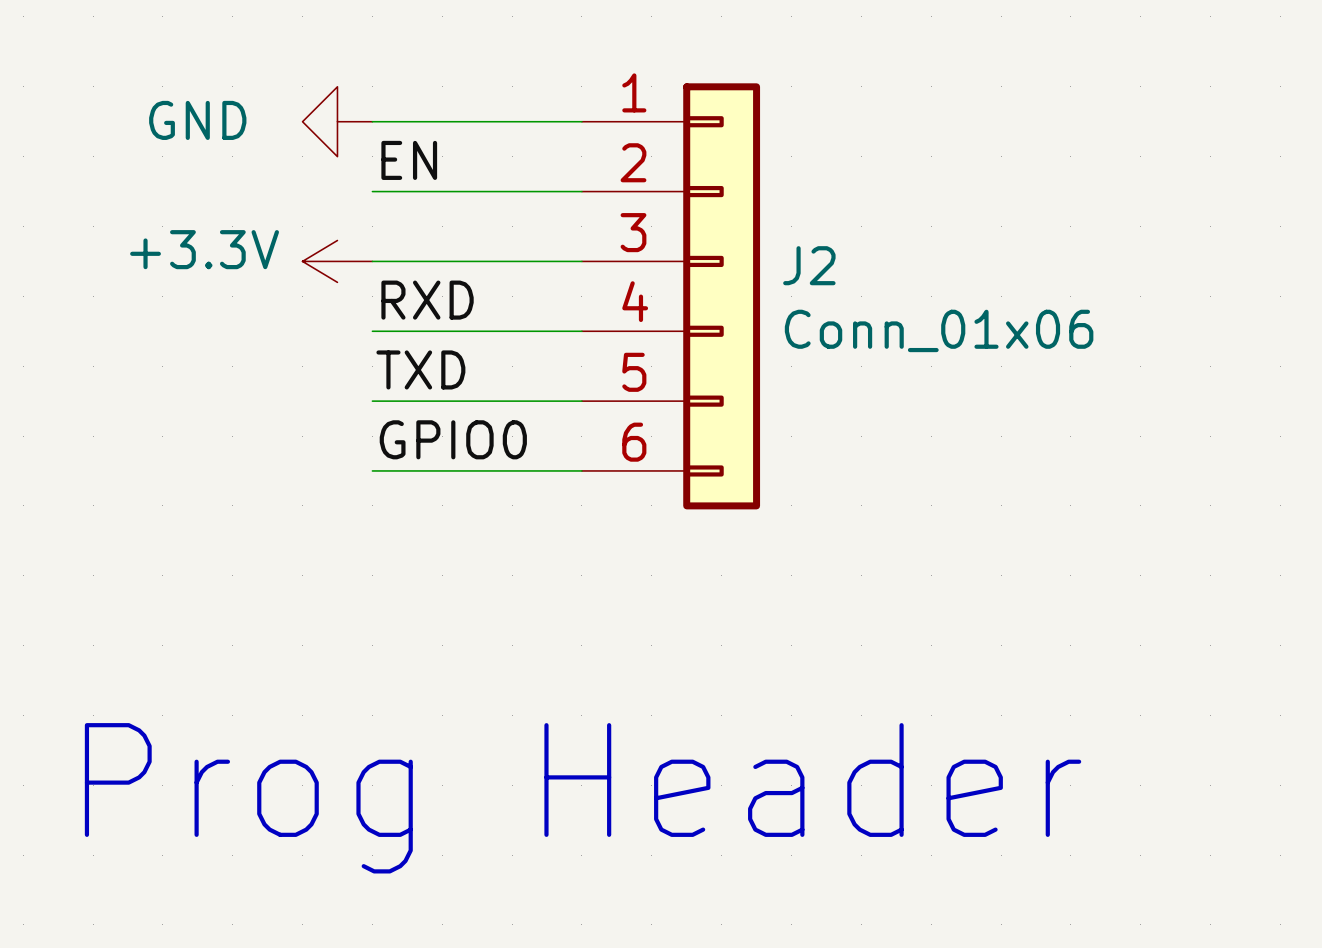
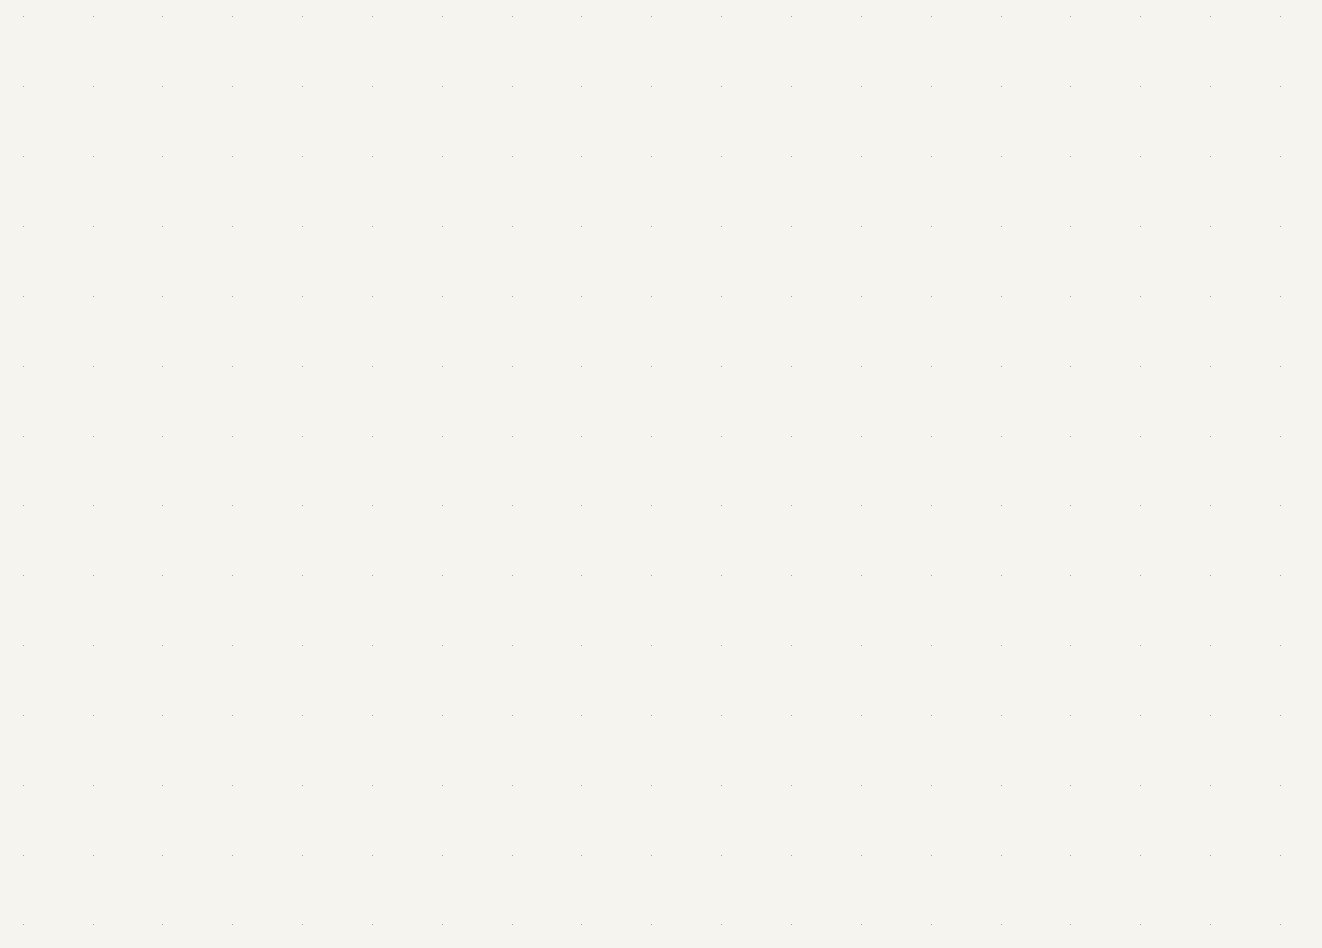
power symbol: GND (337, 121) -> none
wire: (372, 121) (581, 121) -> none
label: EN (409, 160) -> none
wire: (372, 191) (581, 191) -> none
power symbol: +3.3V (337, 261) -> none
wire: (372, 261) (581, 261) -> none
J2: Conn_01x06 (670, 296) -> none
label: RXD (427, 300) -> none
wire: (372, 331) (581, 331) -> none
label: TXD (420, 369) -> none
wire: (372, 401) (581, 401) -> none
label: GPIO0 (453, 439) -> none
wire: (372, 470) (581, 470) -> none
text: Prog Header (583, 798) -> none

